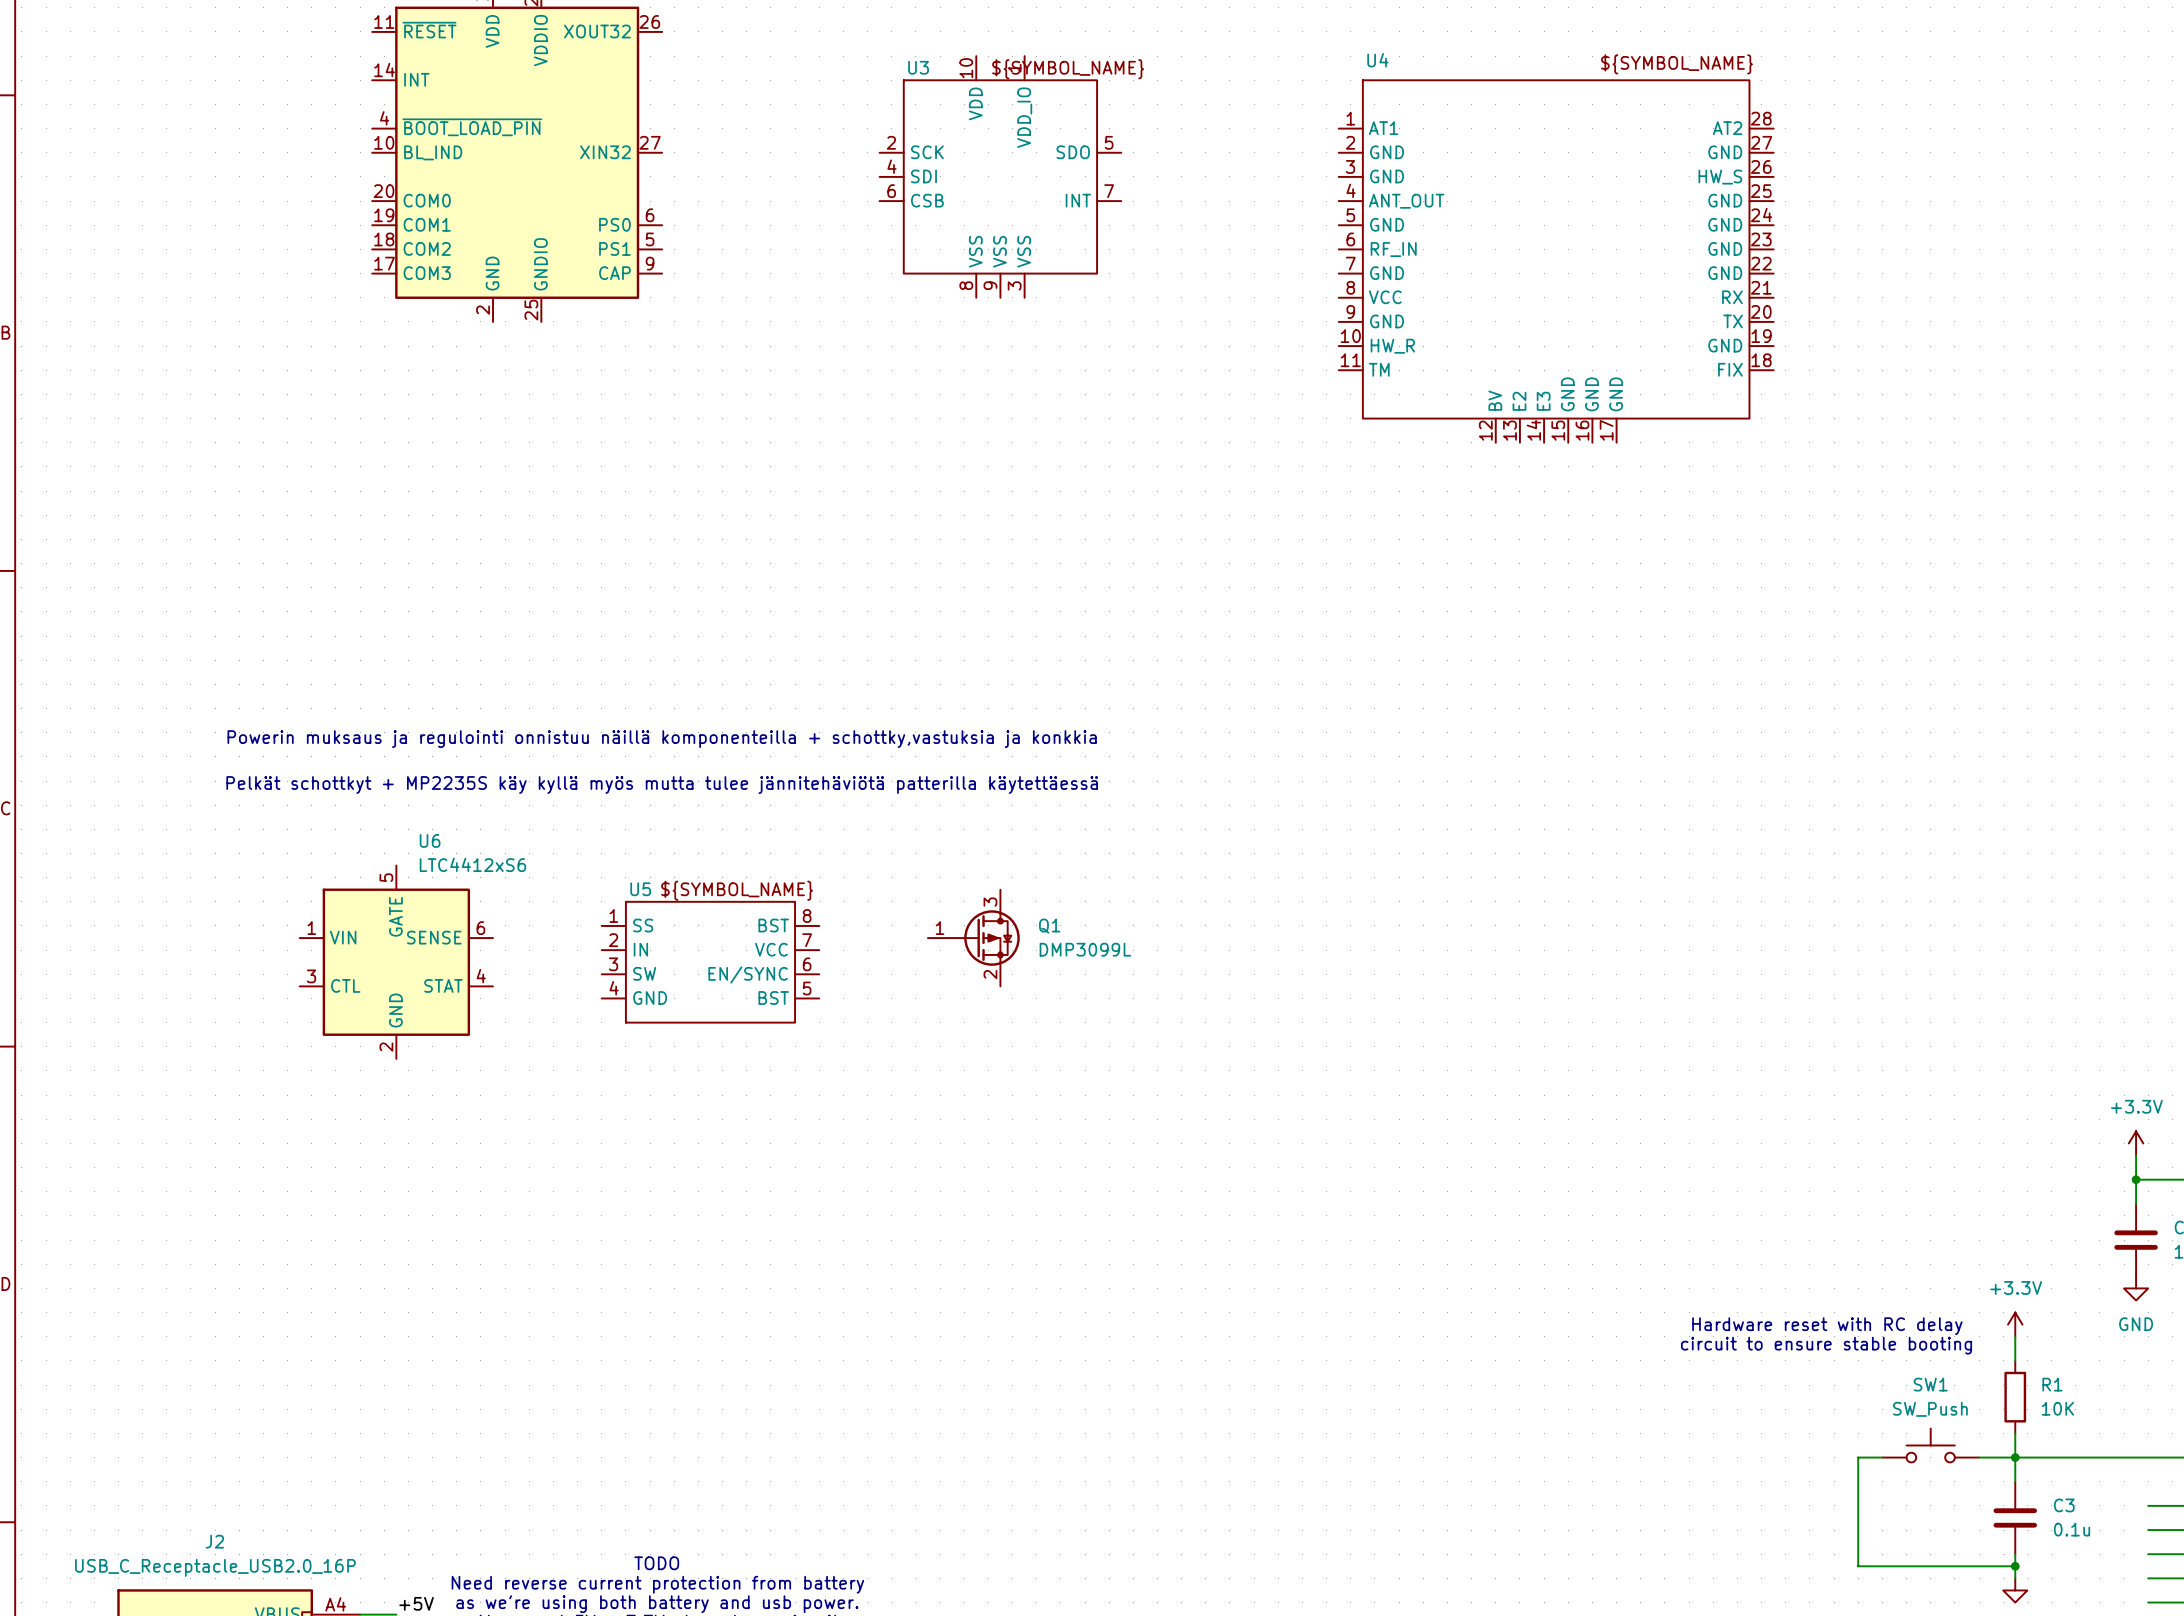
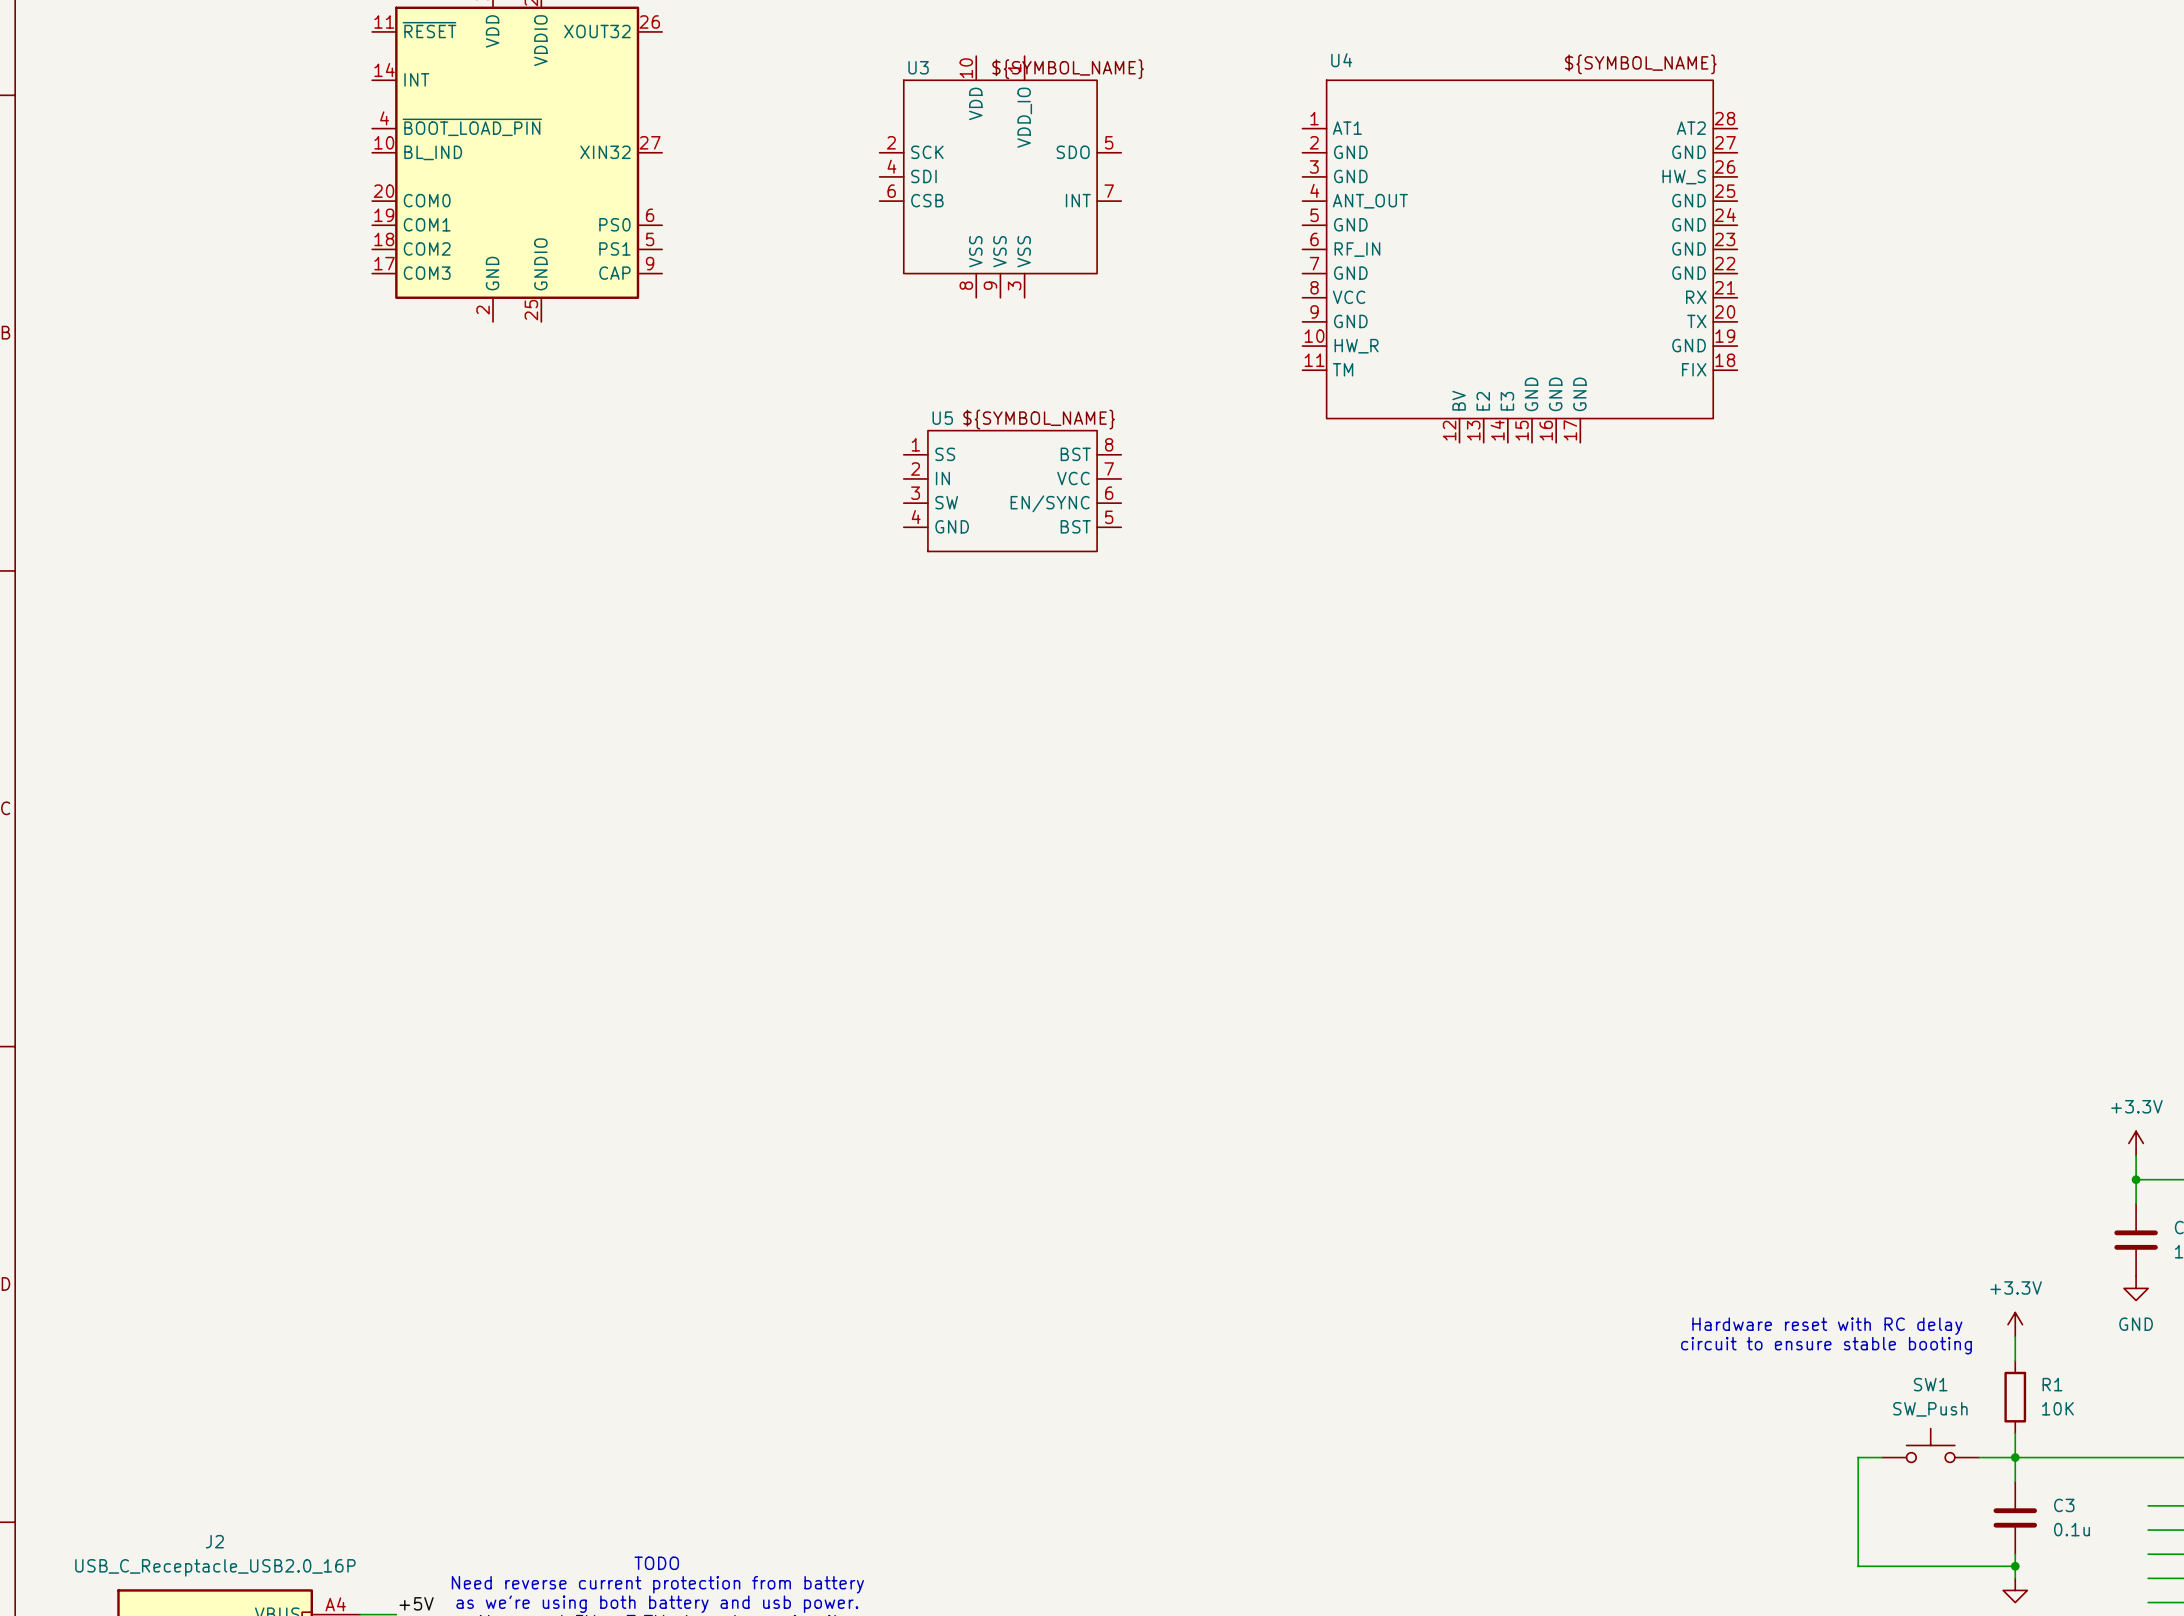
U4 position: (1556, 261) -> (1519, 261)
text: Powerin muksaus ja regulointi onnistuu näillä komponenteilla + schottky,vastuksia ja konkkia (662, 739) -> none
text: Pelkät schottkyt + MP2235S käy kyllä myös mutta tulee jännitehäviötä patterilla käytettäessä (662, 785) -> none
Q1: DMP3099L (973, 938) -> none
U6: LTC4412xS6 (396, 962) -> none
U5 position: (710, 962) -> (1012, 491)

